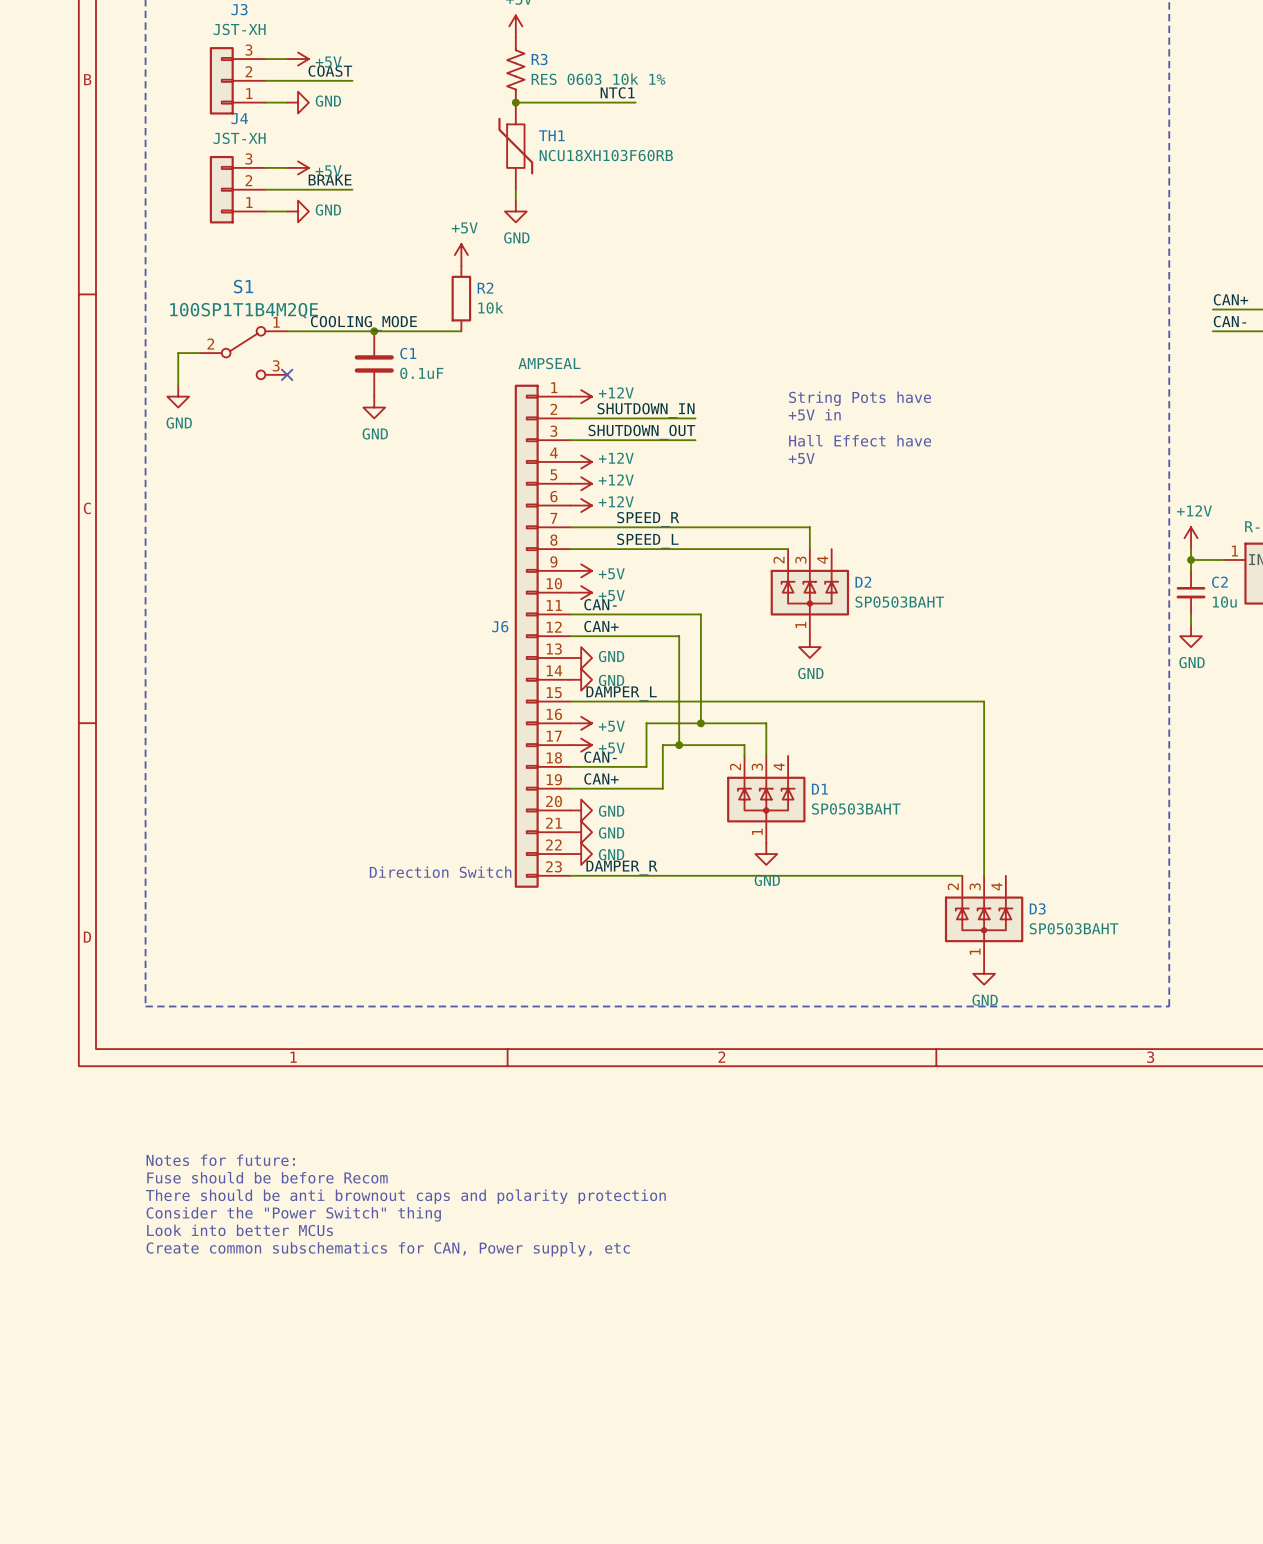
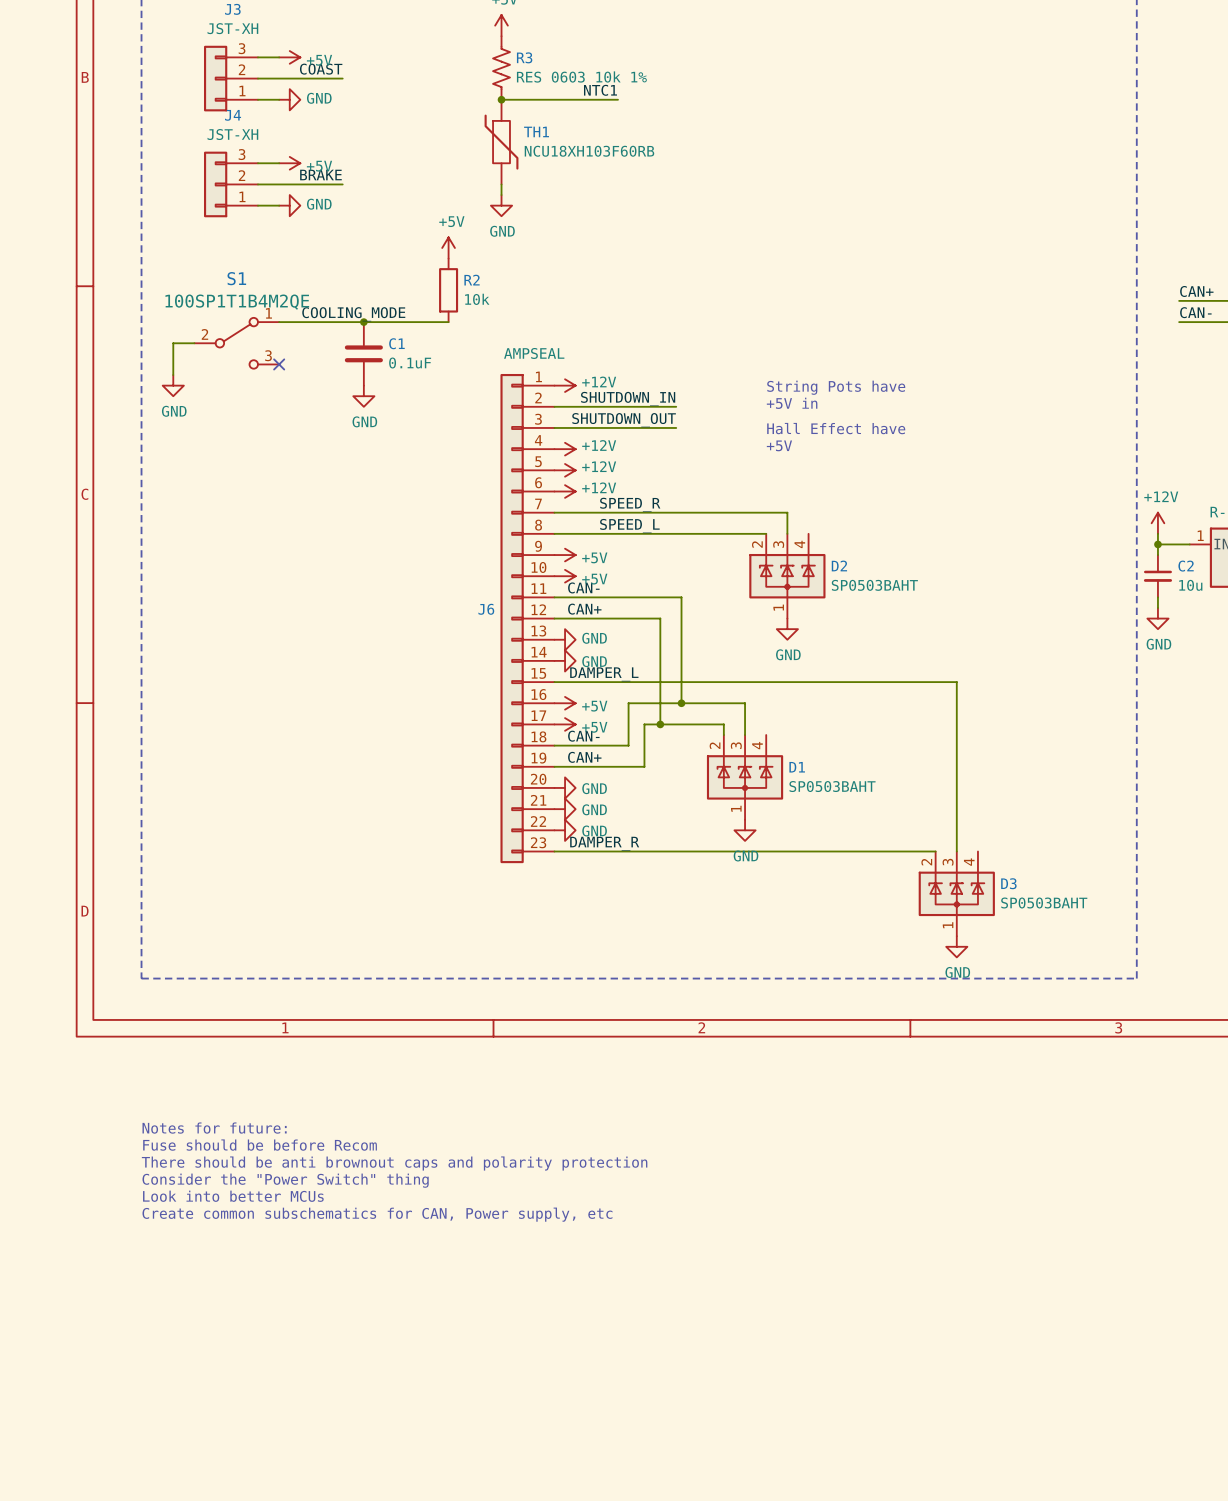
text: Direction Switch (440, 872) -> none

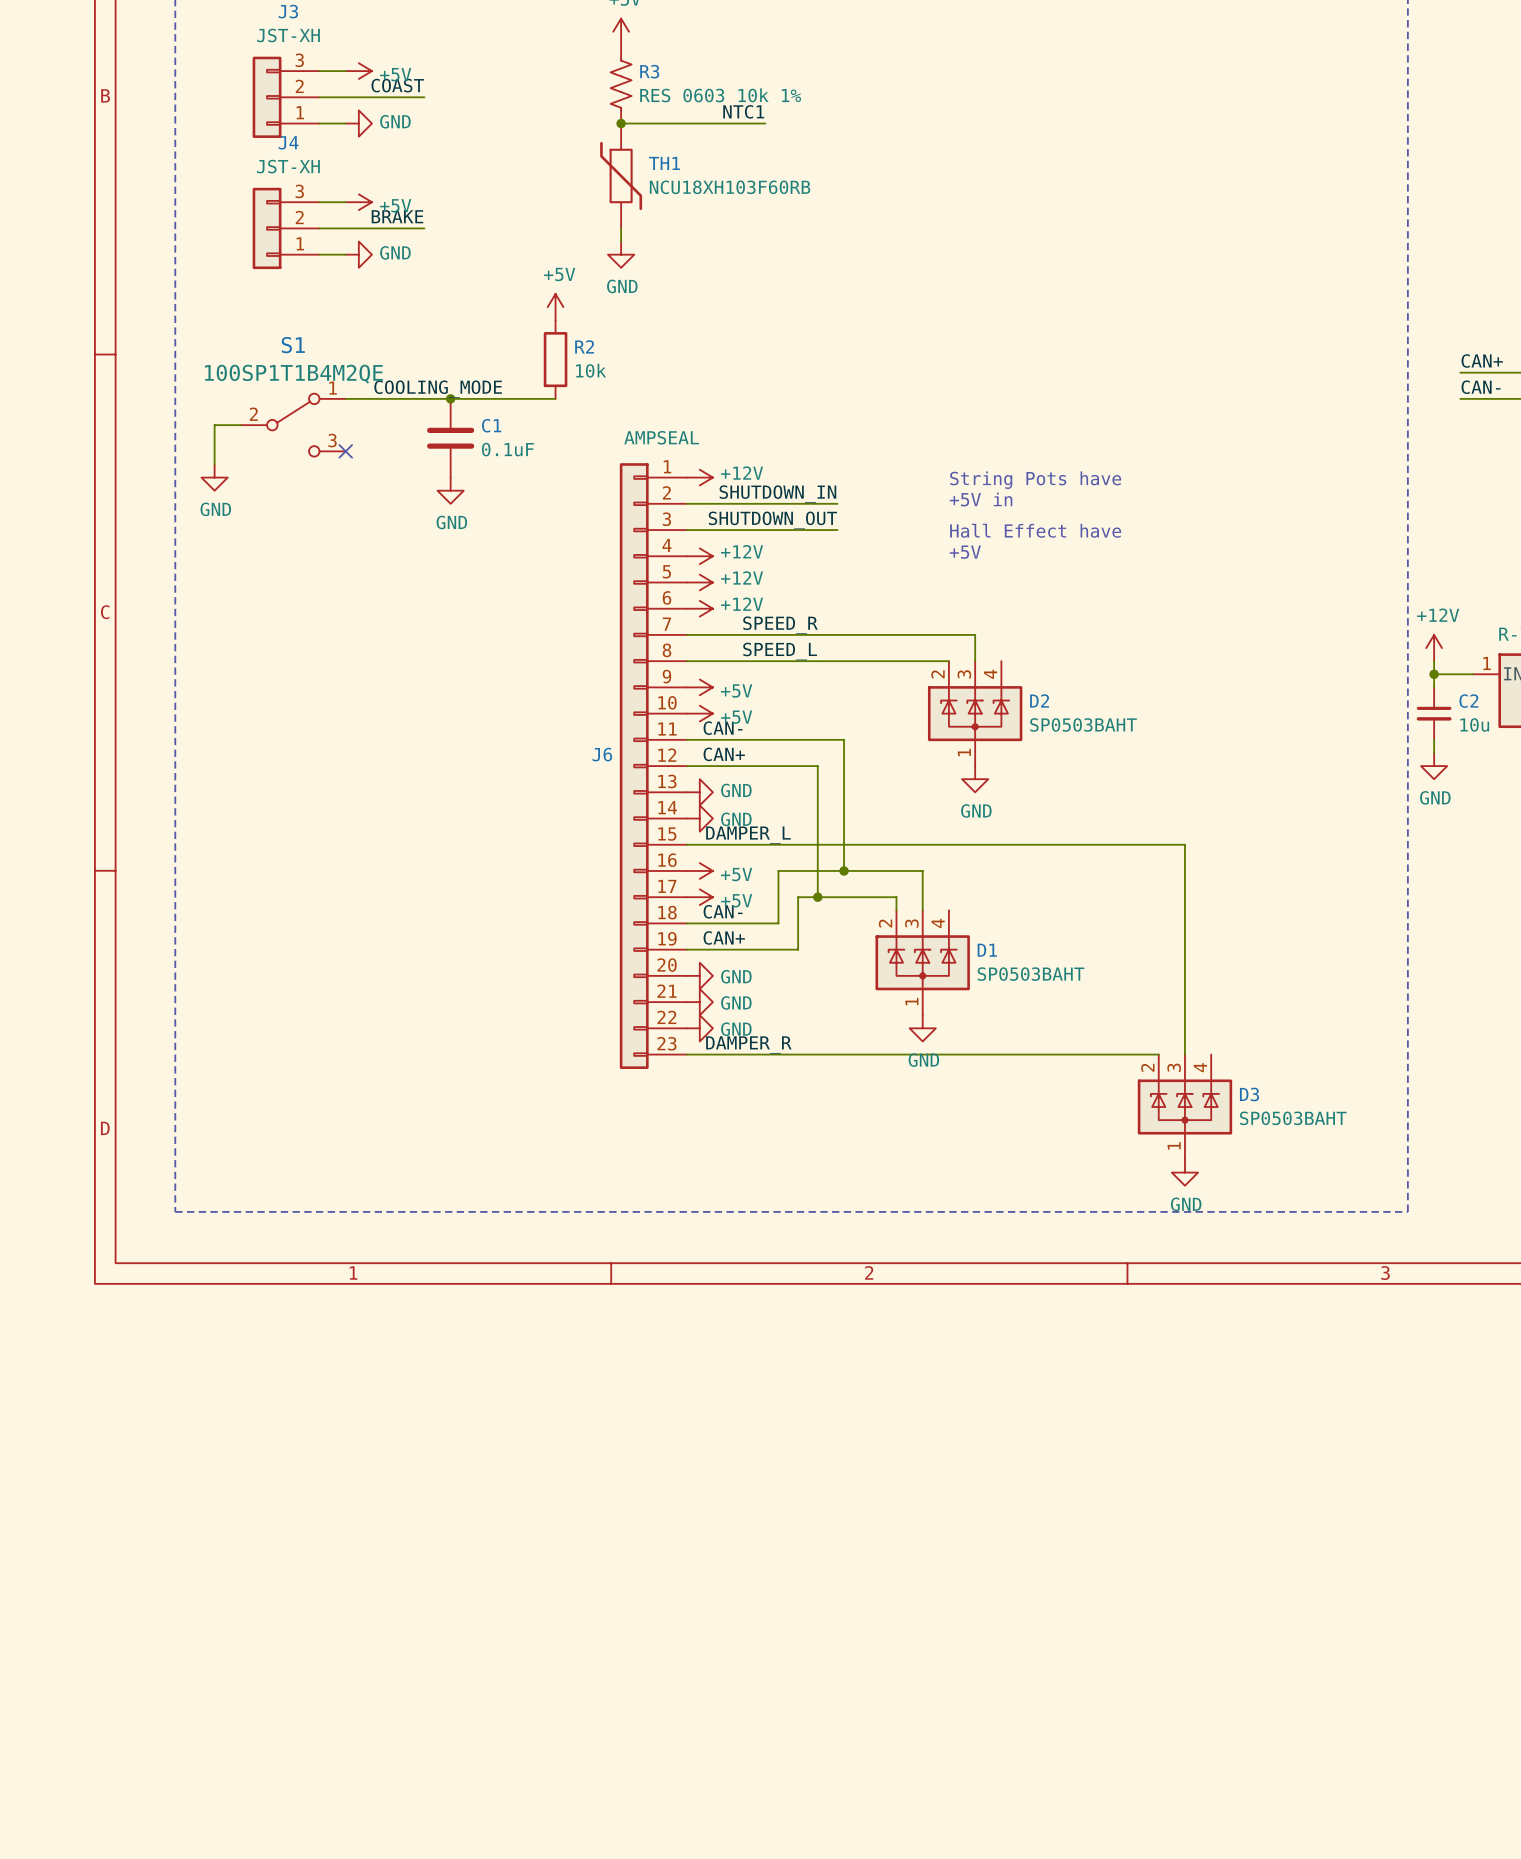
text: Notes for future: (214, 1128) -> none
text: Fuse should be before Recom (260, 1145) -> none
text: There should be anti brownout caps and polarity protection (394, 1163) -> none
text: Consider the "Power Switch" thing (285, 1180) -> none
text: Look into better MCUs (233, 1196) -> none
text: Create common subschematics for CAN, Power supply, etc (377, 1214) -> none

